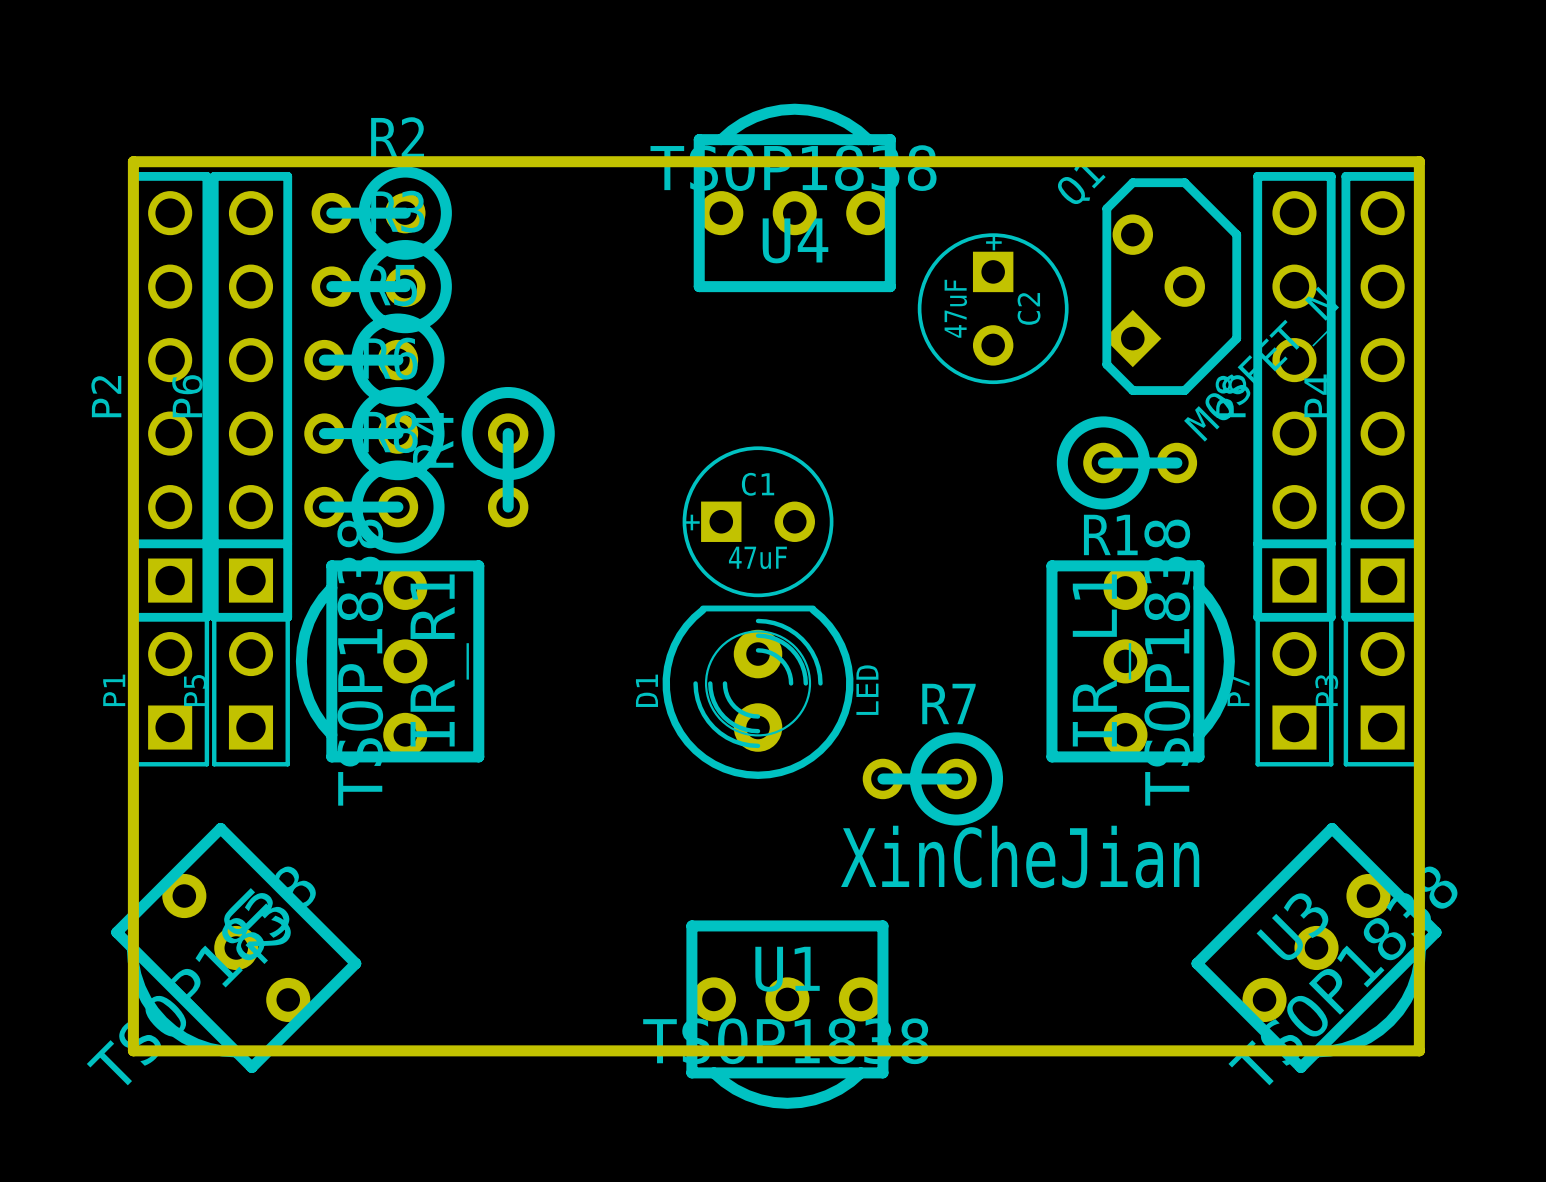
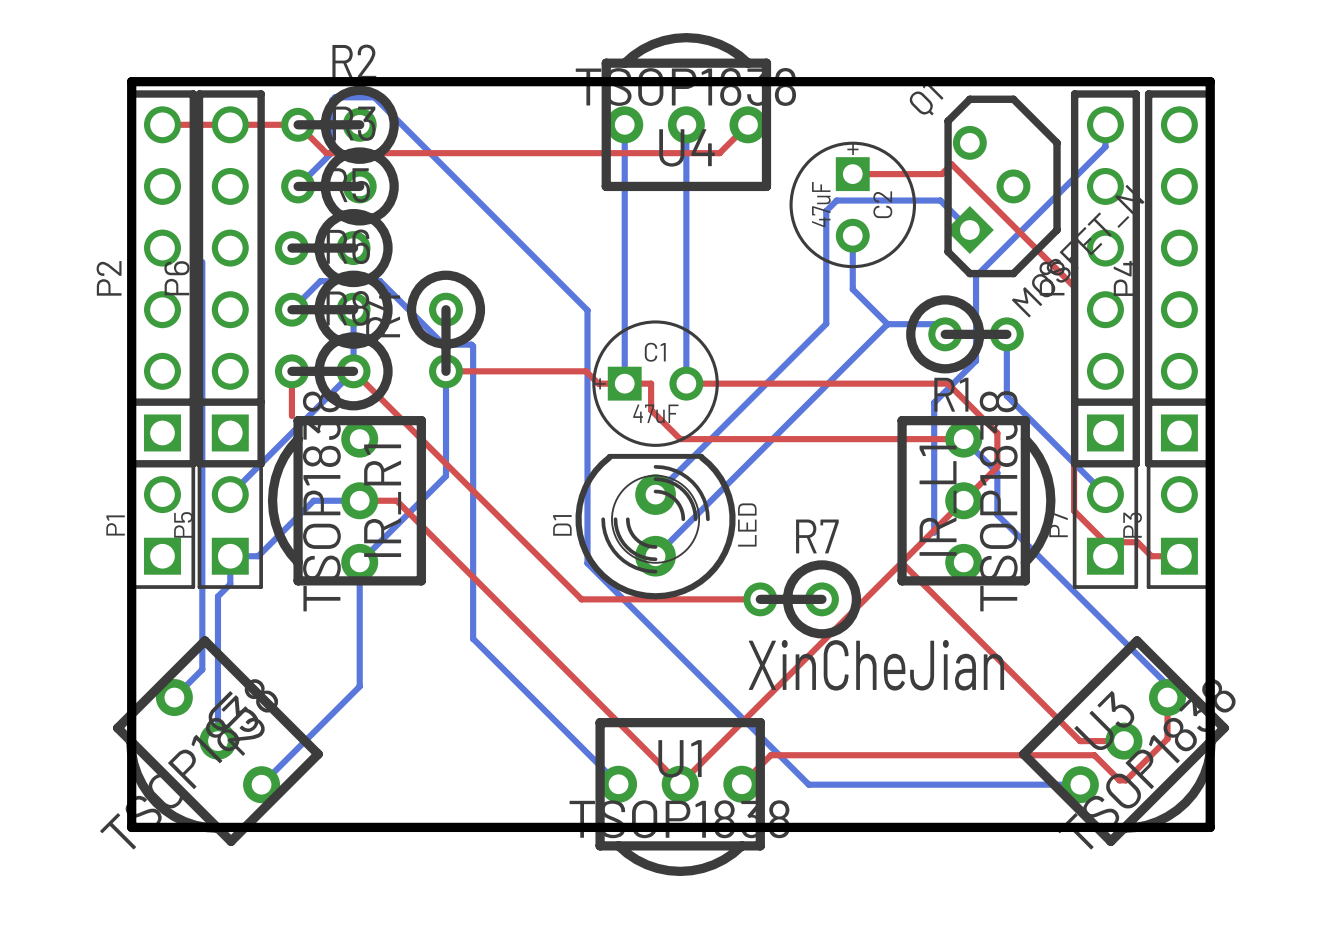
top track: none -> (162, 124) (298, 124) (326, 153) (719, 153) (747, 124)
bottom track: none -> (624, 124) (624, 383)
bottom track: none -> (686, 124) (686, 383)
bottom track: none -> (1105, 124) (1105, 146) (976, 276) (976, 360) (934, 402) (934, 532)
top track: none -> (852, 174) (941, 174) (951, 164) (1074, 286) (1074, 510) (1105, 542)
bottom track: none -> (298, 186) (332, 152) (332, 100) (335, 97) (374, 97) (587, 310) (587, 563) (808, 784) (1080, 784)
bottom track: none -> (969, 230) (940, 200) (836, 200) (826, 211) (826, 323) (655, 494)
bottom track: none -> (852, 235) (852, 289) (887, 324)
bottom track: none -> (202, 262) (202, 669) (174, 697)
bottom track: none -> (291, 309) (320, 281) (380, 281) (443, 344) (471, 344) (473, 346) (473, 638) (618, 784)
bottom track: none -> (353, 309) (353, 371) (230, 494)
bottom track: none -> (887, 324) (935, 324) (945, 334)
bottom track: none -> (887, 324) (655, 556)
bottom track: none -> (1006, 334) (1006, 395) (1105, 494)
top track: none -> (291, 371) (291, 416)
top track: none -> (353, 371) (581, 599) (760, 599)
bottom track: none -> (446, 371) (446, 476) (359, 562) (359, 686) (261, 784)
top track: none -> (446, 371) (586, 371) (598, 383) (651, 383) (651, 410) (680, 439) (963, 439)
top track: none -> (686, 383) (947, 383) (997, 433) (997, 467) (680, 784) (396, 500) (359, 500)
bottom track: none -> (963, 439) (997, 472) (997, 514) (1167, 684) (1167, 697)
bottom track: none -> (359, 500) (313, 500) (258, 556) (230, 556) (230, 584) (217, 596) (217, 741)
top track: none -> (1105, 542) (1137, 542) (1151, 556) (1179, 556)
top track: none -> (901, 562) (1080, 741) (1123, 741)
top track: none -> (1167, 697) (1167, 738) (1126, 780) (1119, 780) (1094, 755) (770, 755) (741, 784)

